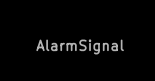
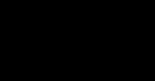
label: AlarmSignal (80, 47) -> none

